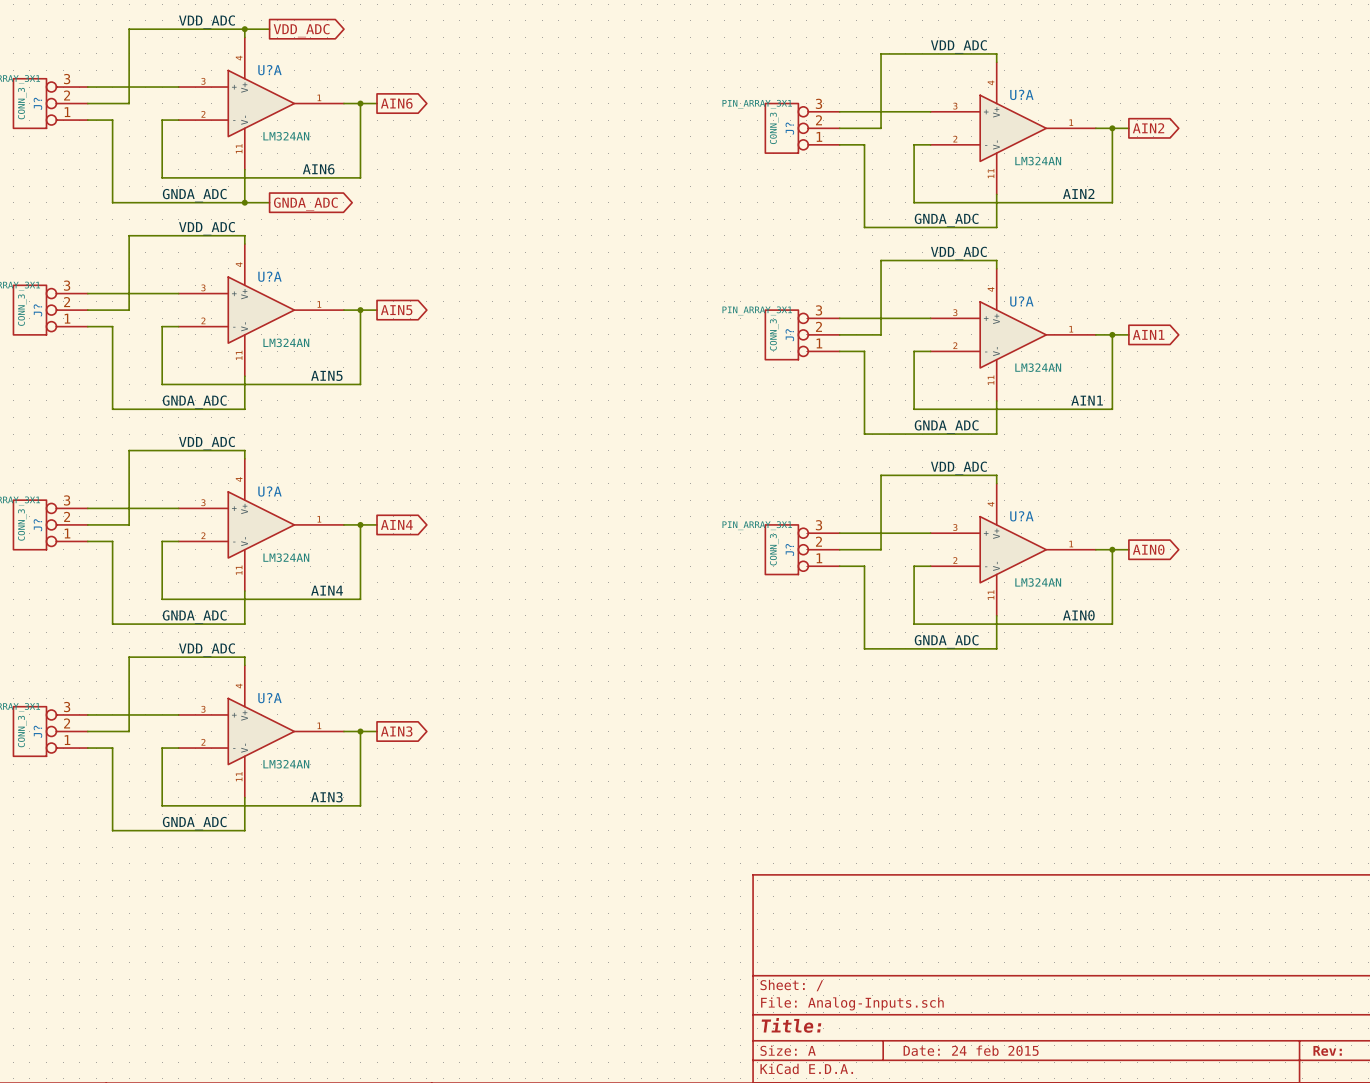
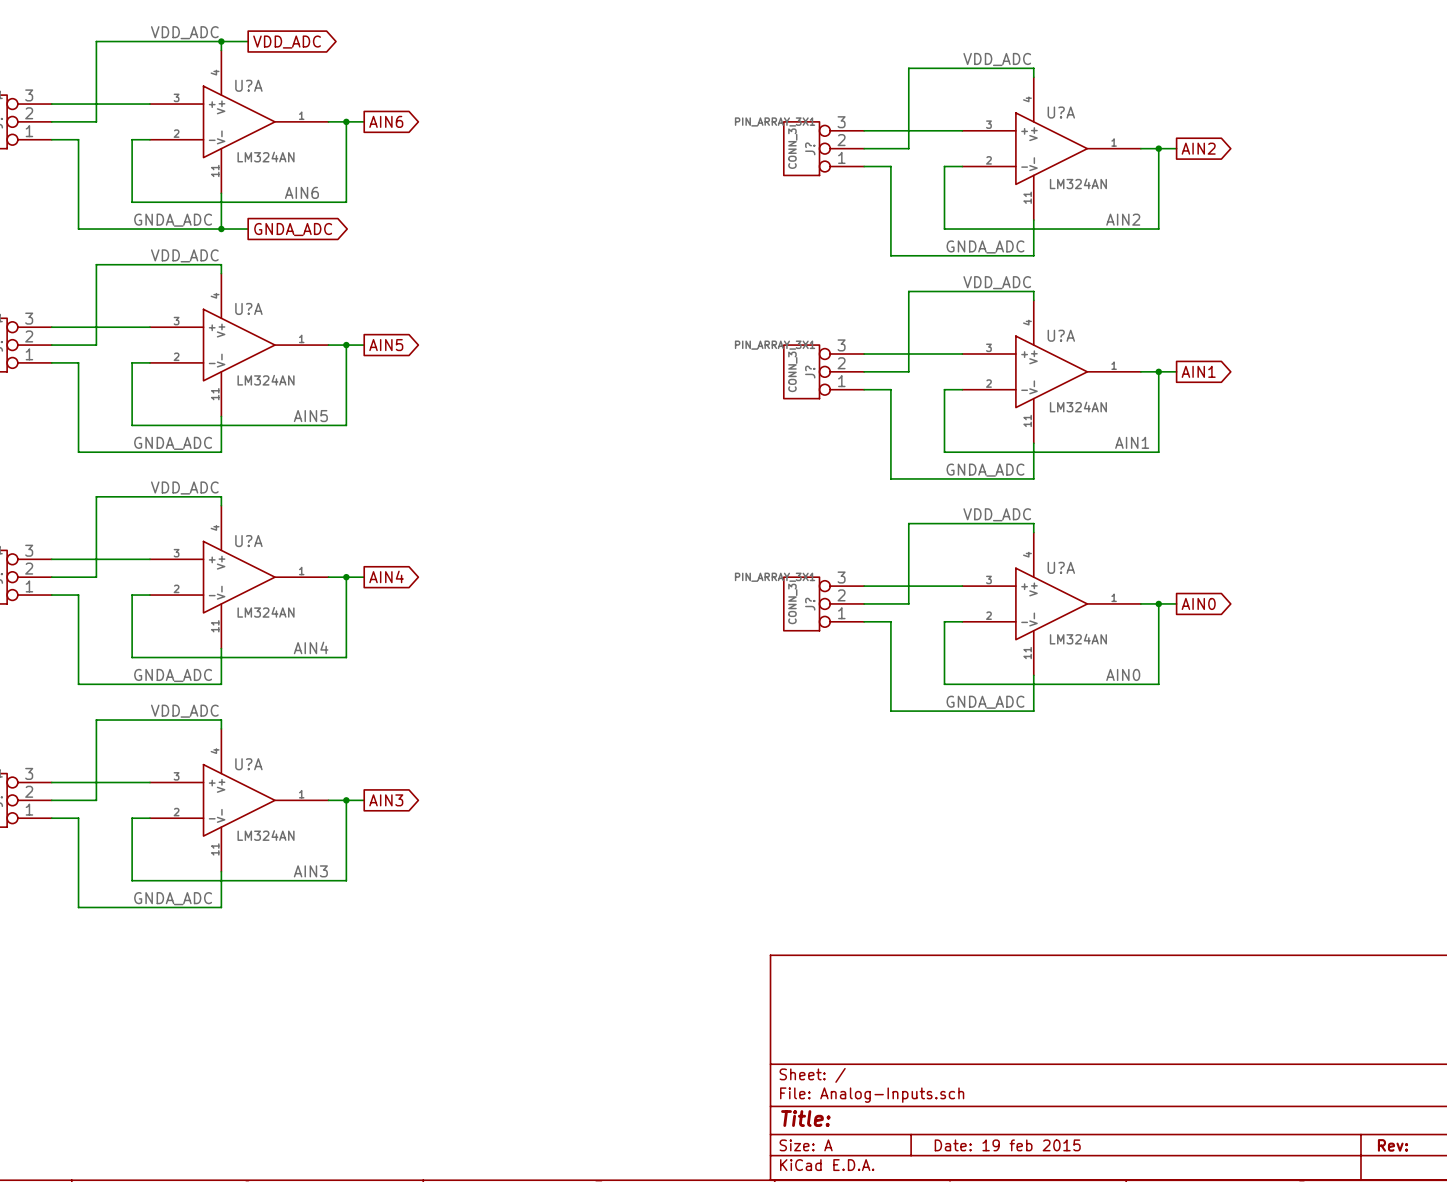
title block: Date: 24 feb 2015 (971, 1050) -> Date: 19 feb 2015 (1007, 1145)

